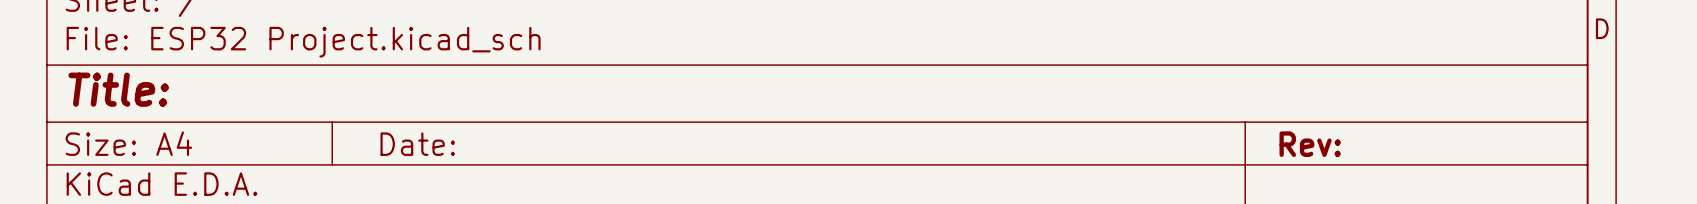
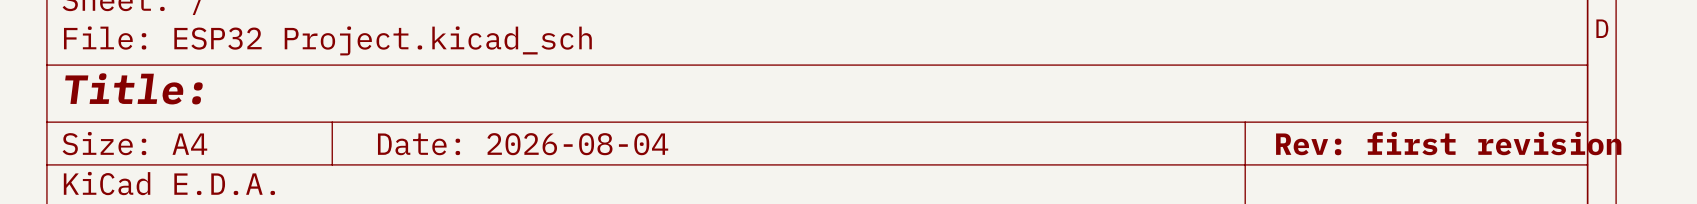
title block: Date: (417, 144) -> Date: 2026-08-04 (523, 144)
title block: Rev: (1310, 144) -> Rev: first revision (1448, 143)

